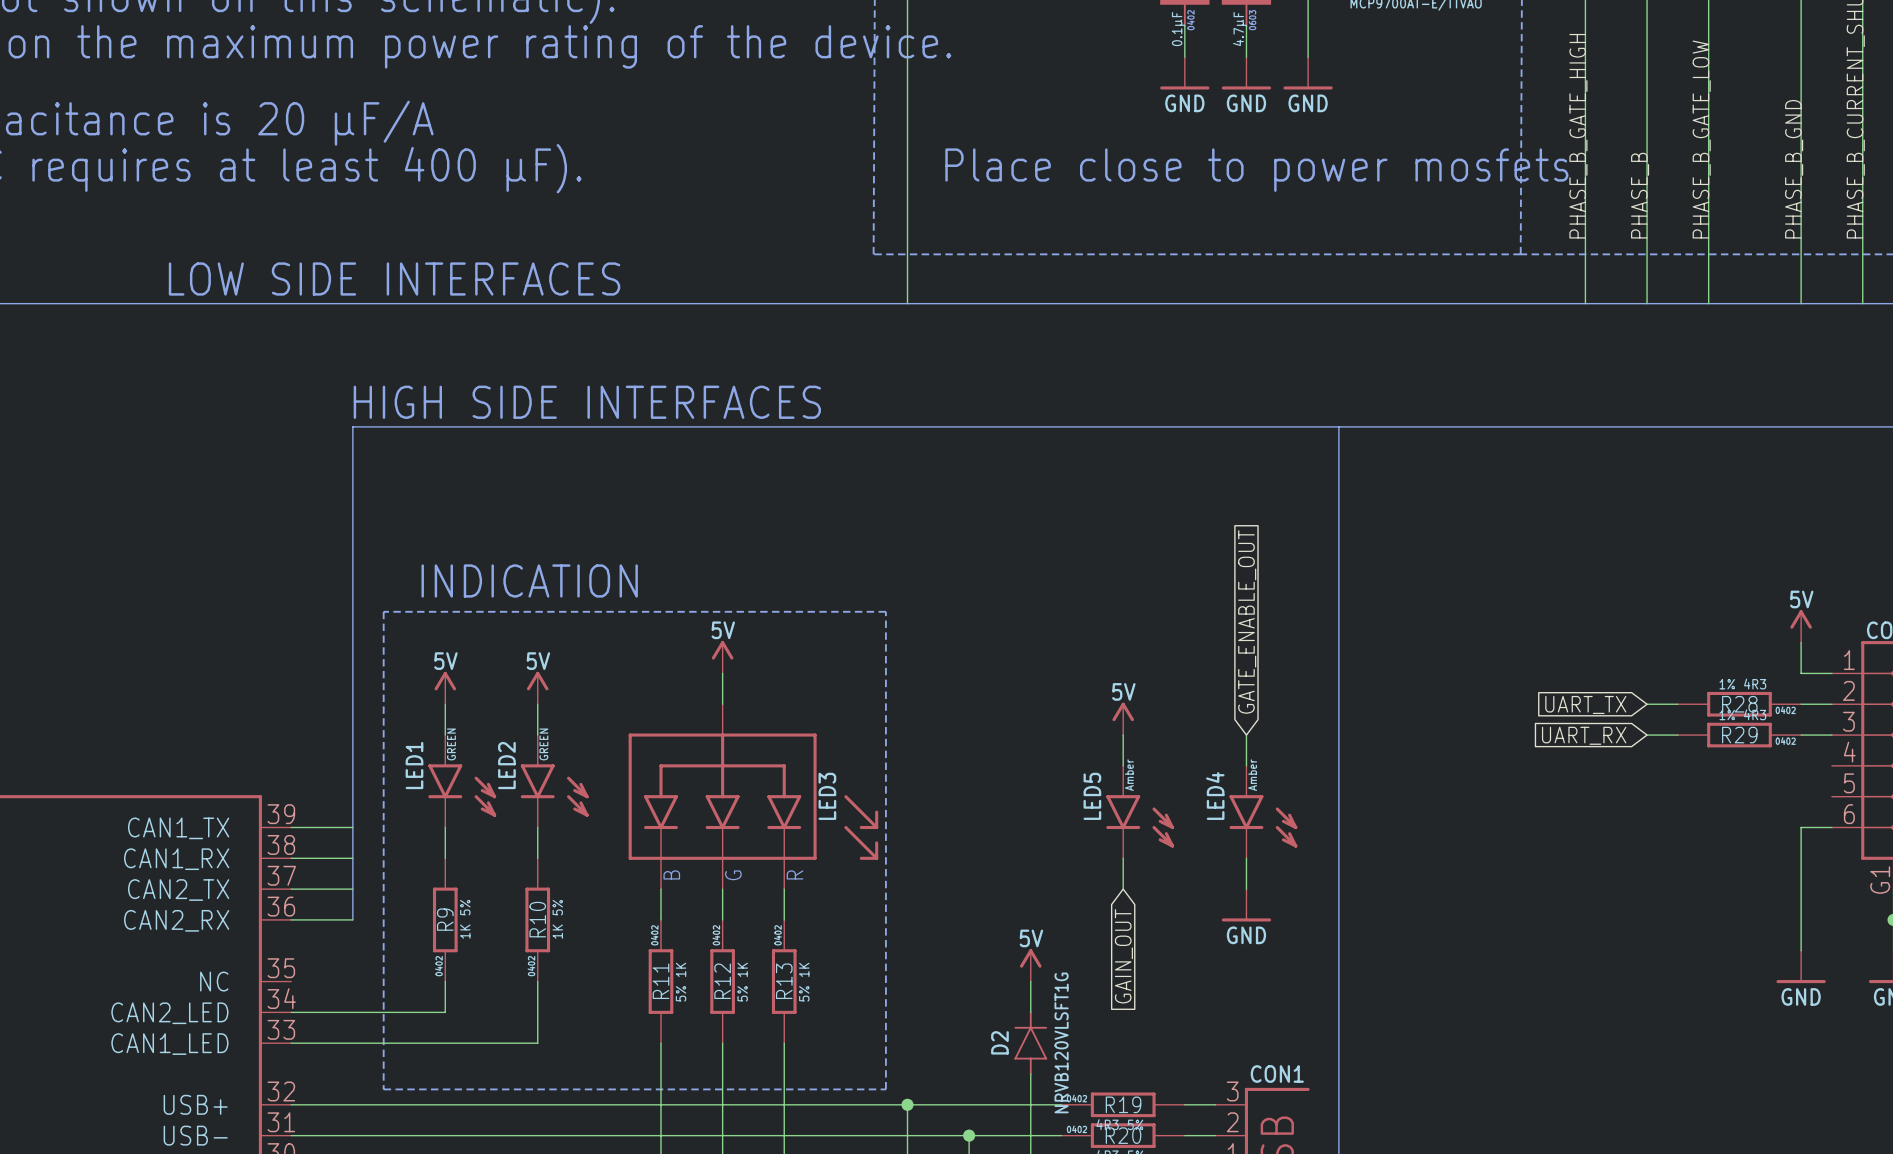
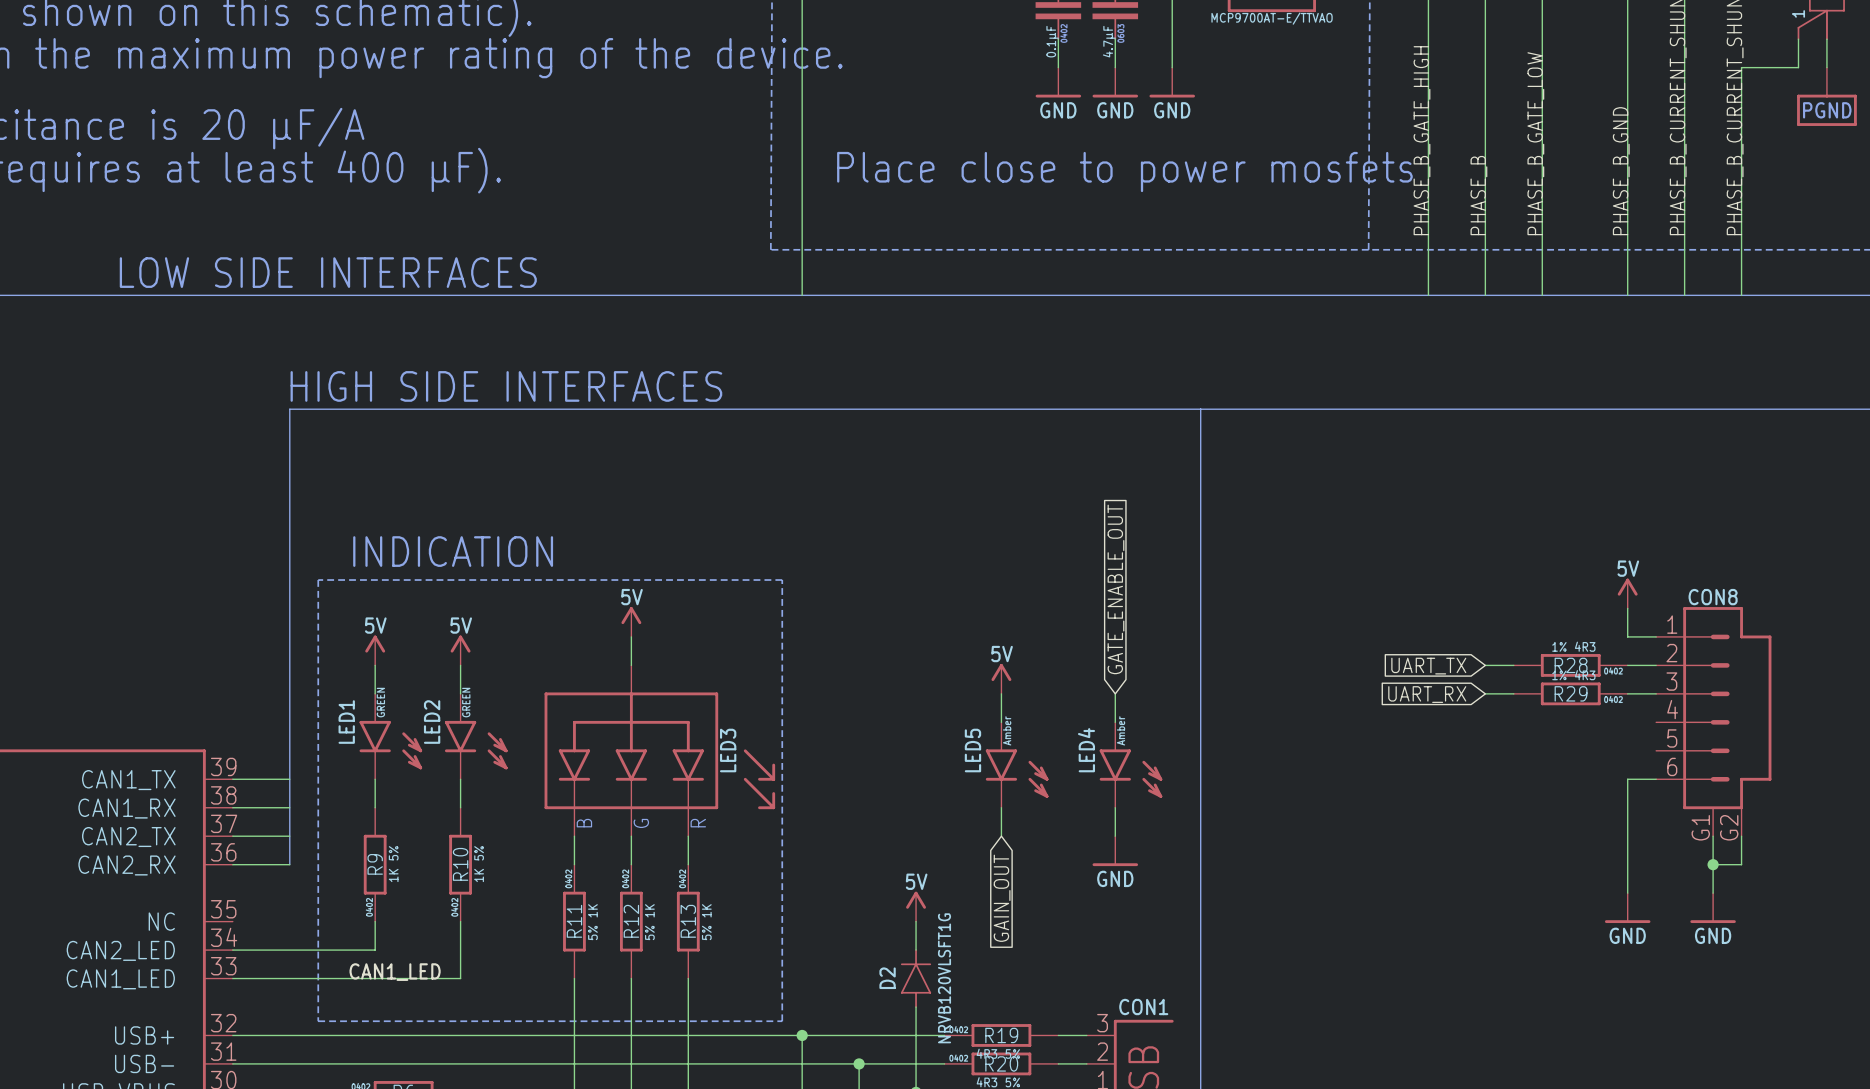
label: none -> CAN1_LED (395, 972)

